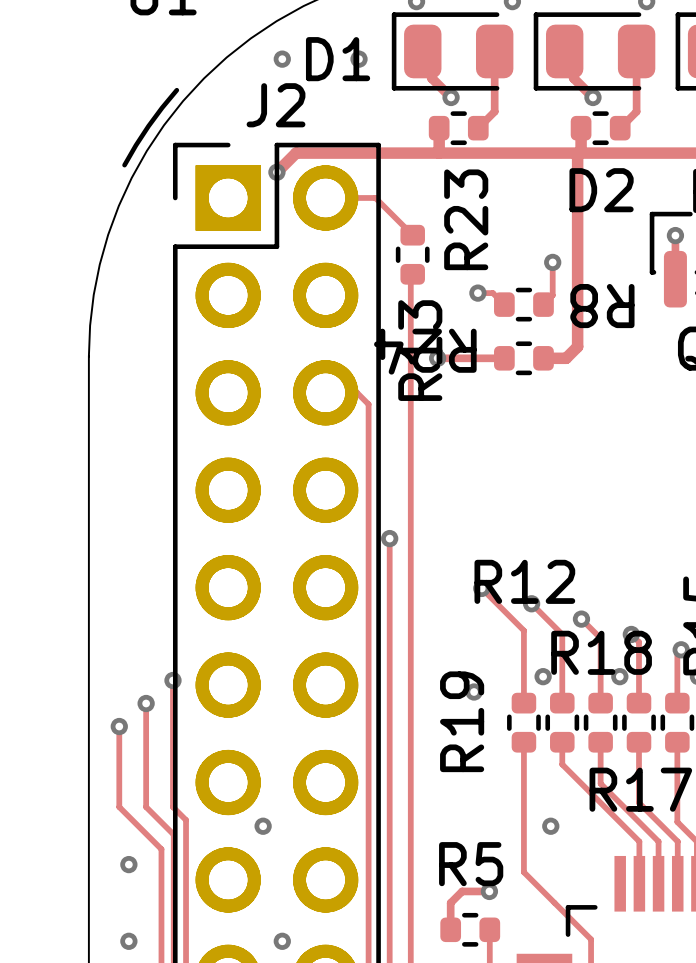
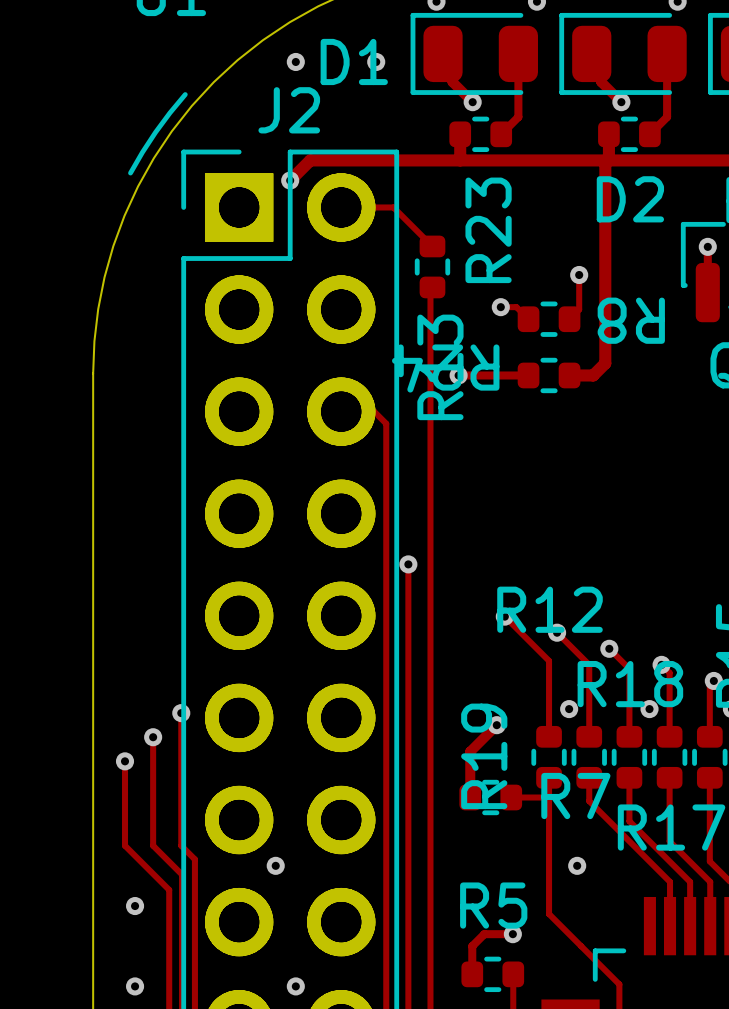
track: none -> (496, 725) (470, 751) (470, 797)
R7: none -> (490, 797)
track: none -> (511, 797) (549, 797)

